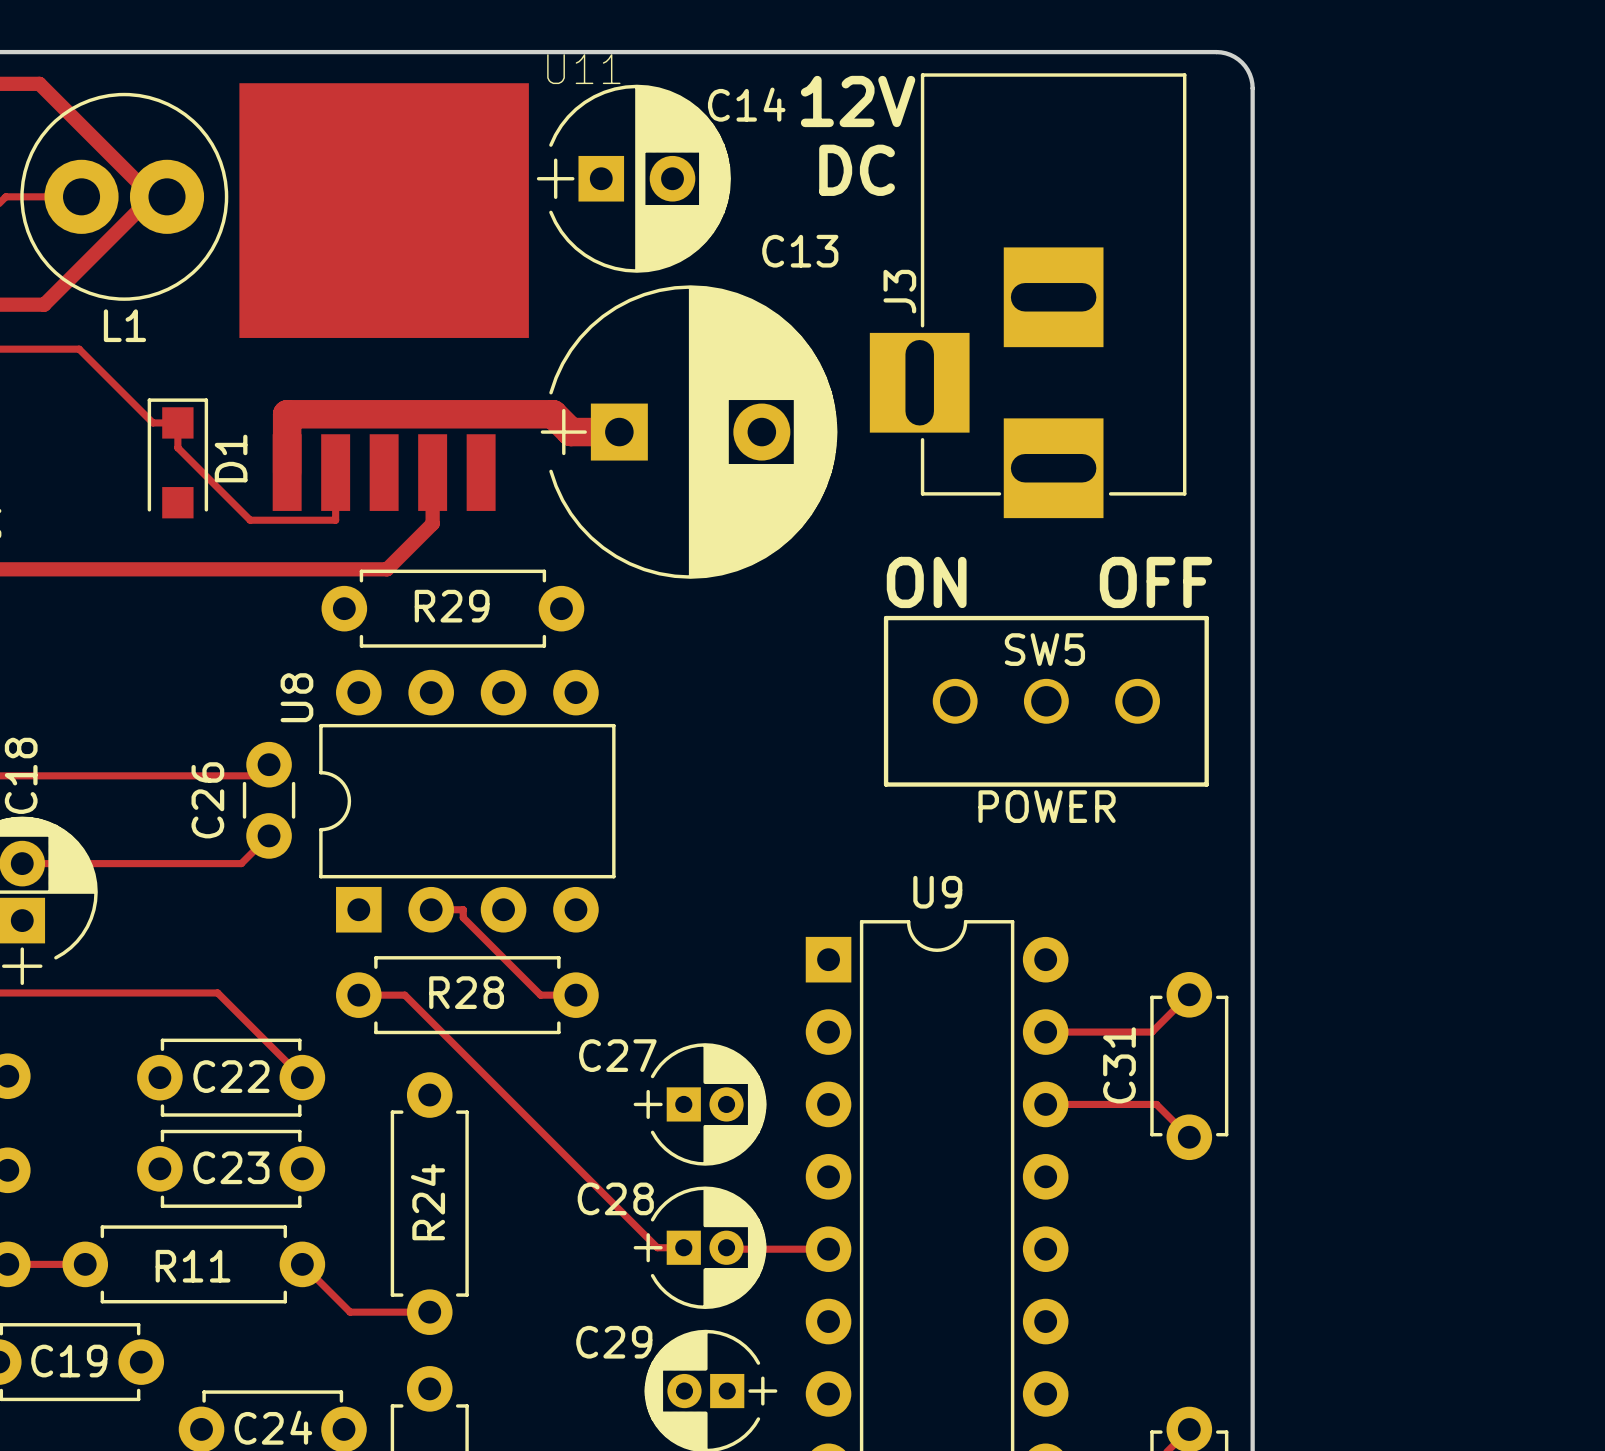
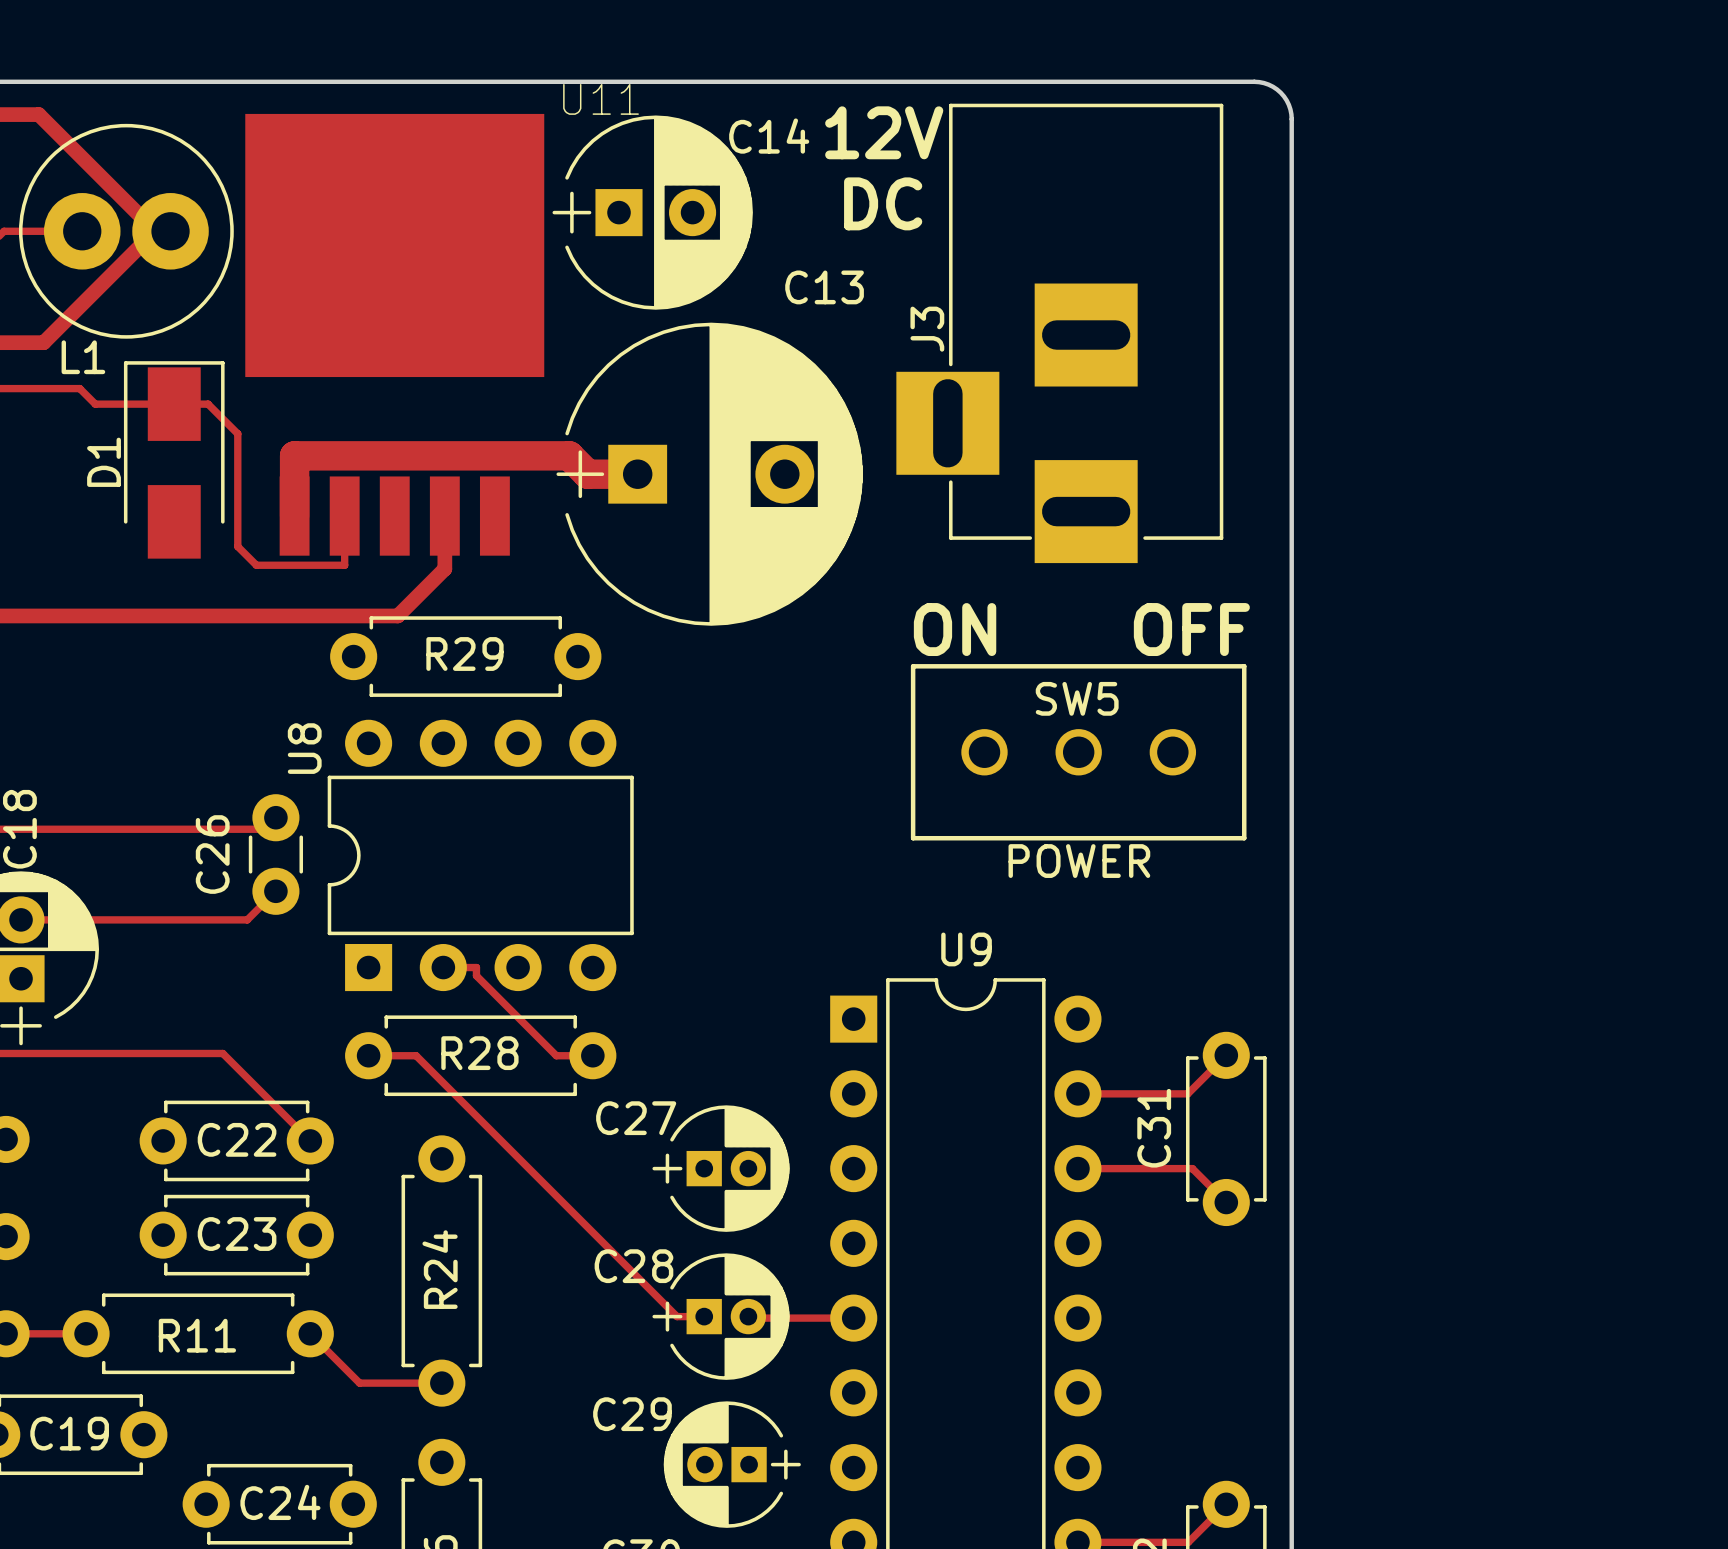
L1 name position: L1 (124, 325) -> L1 (83, 357)
track: (94, 364) (152, 422) (177, 422) (177, 447) (232, 502) -> (95, 404) (208, 404) (237, 433) (237, 546)
D1 footprint: [147, 398, 209, 519] -> [123, 361, 225, 559]
D1 name position: D1 (231, 458) -> D1 (104, 462)

